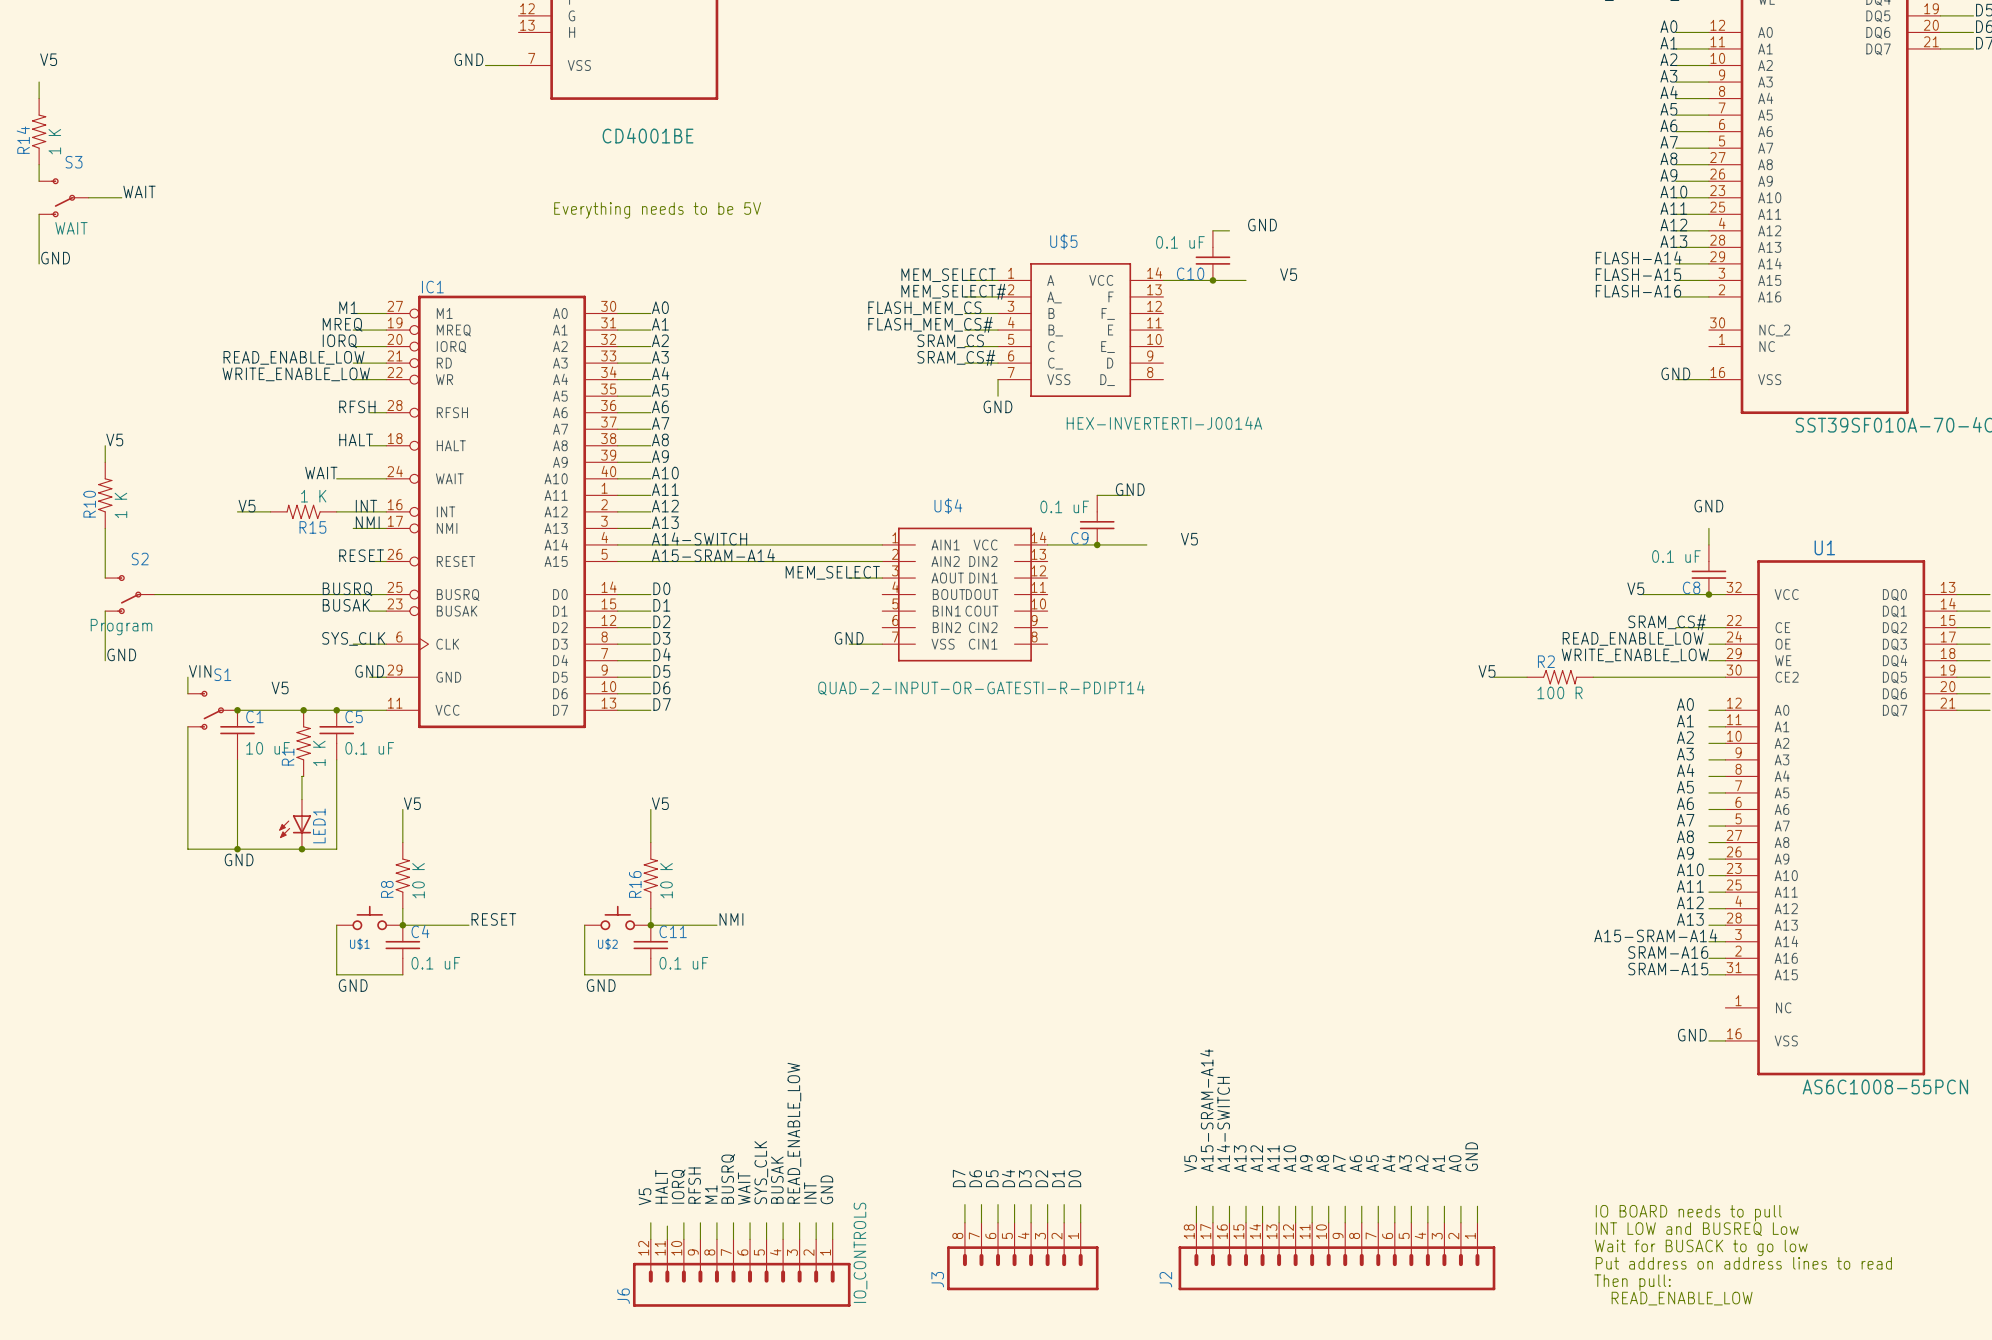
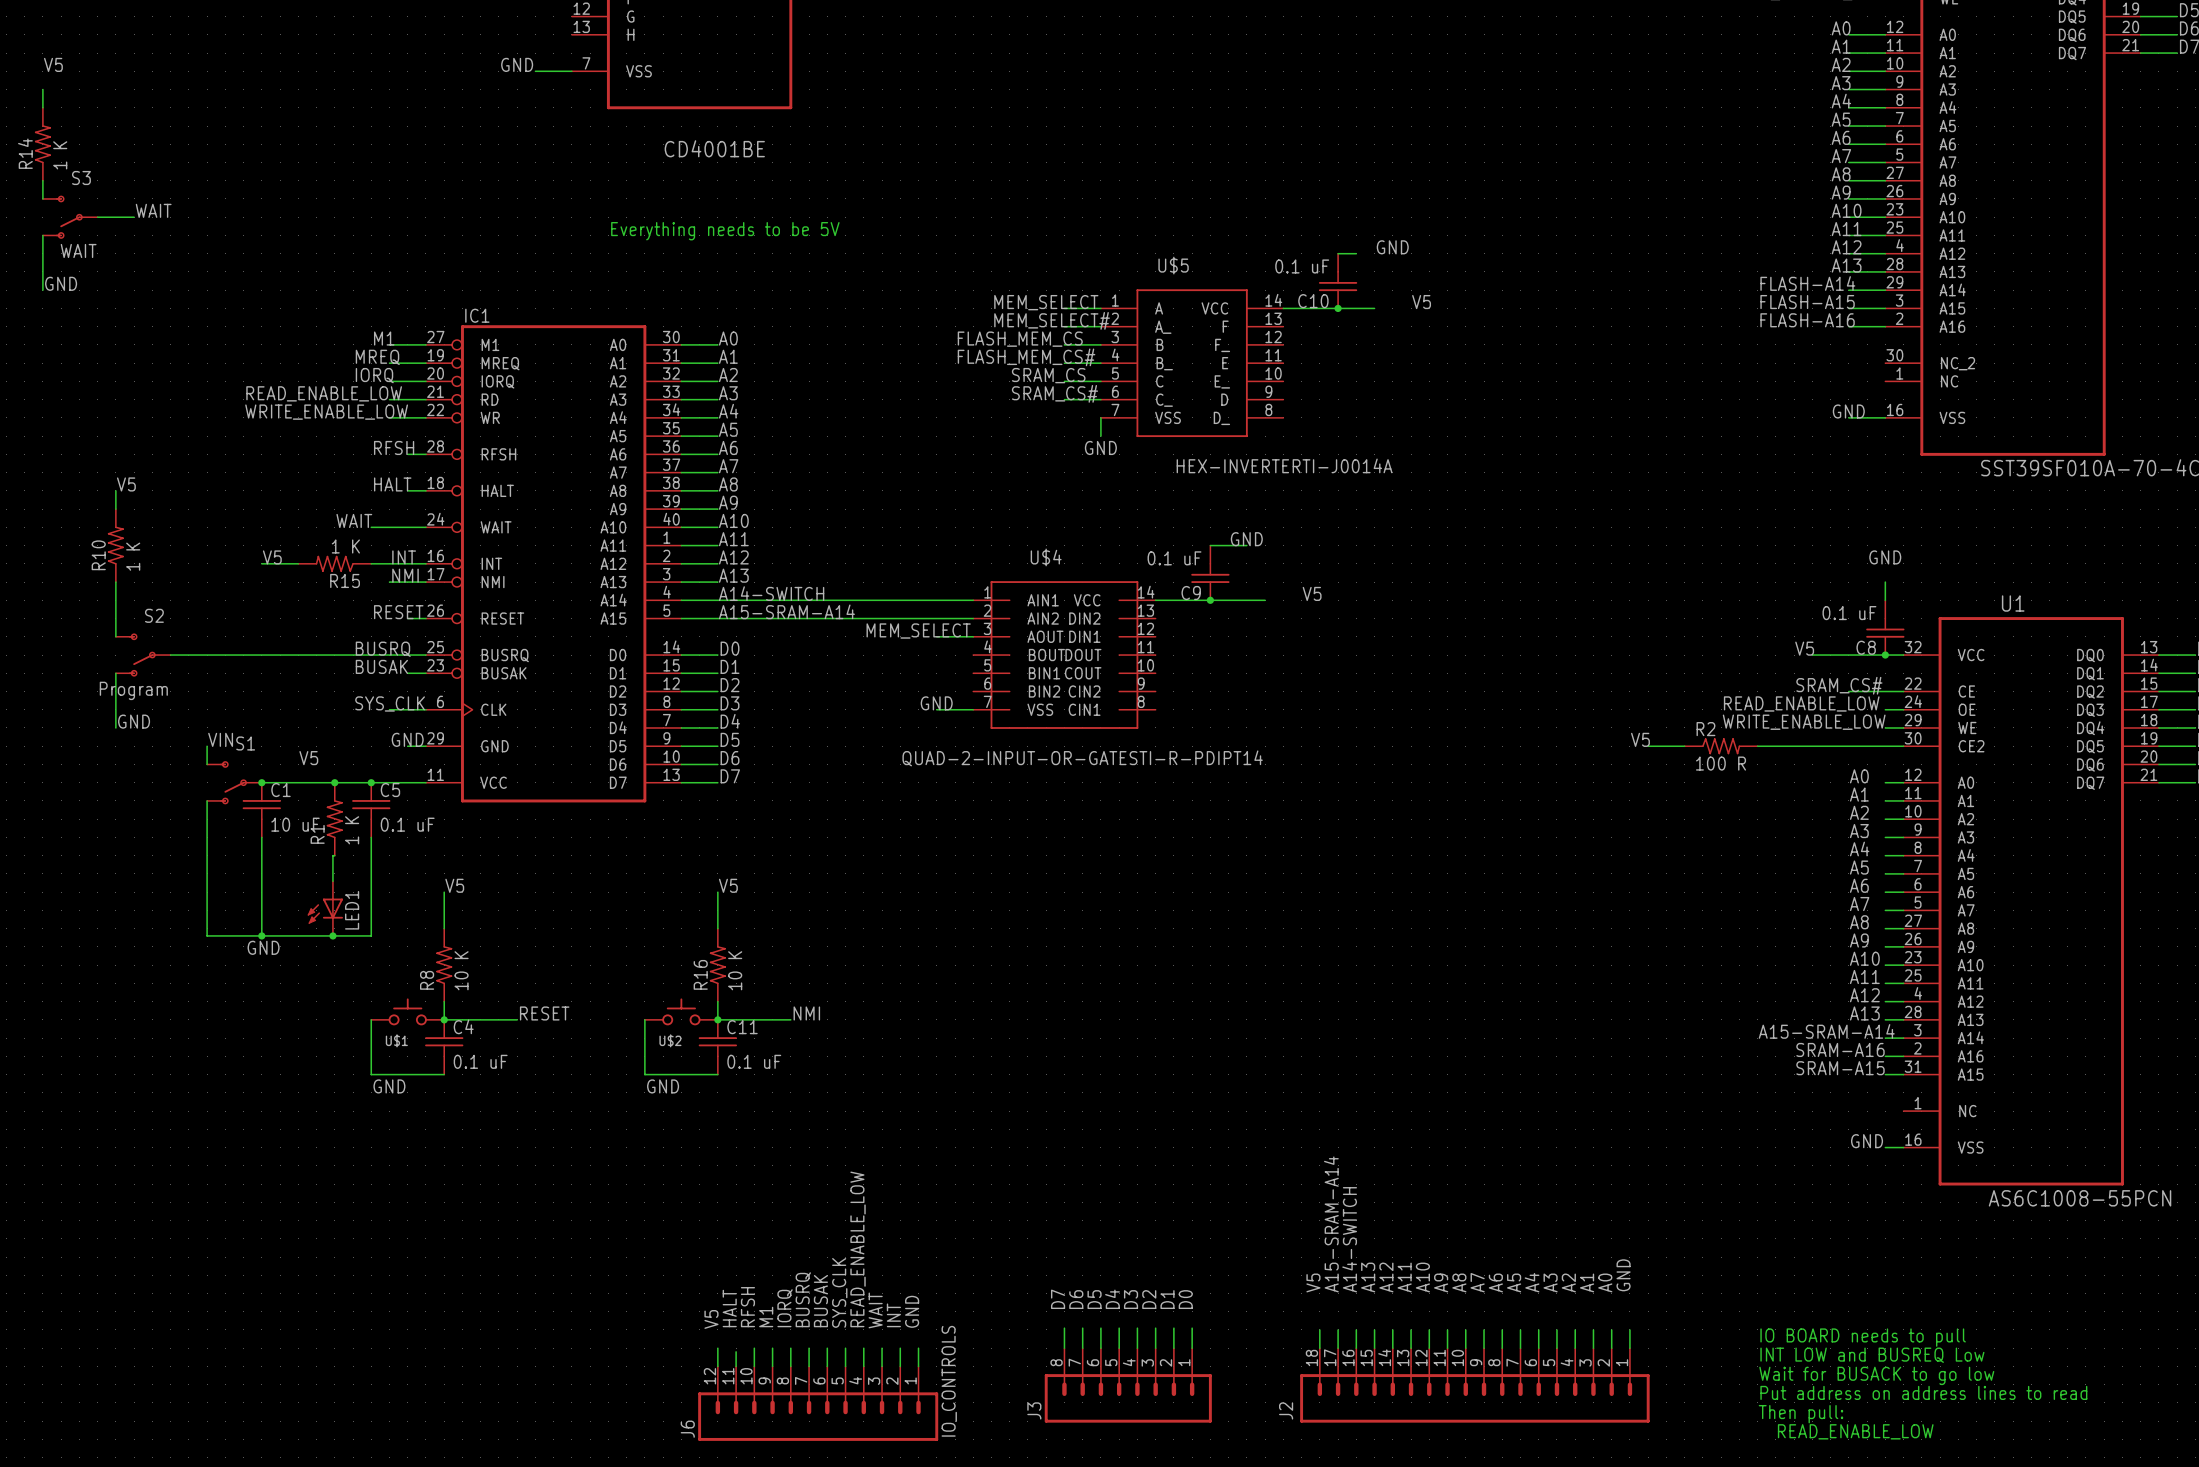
label: READ_ENABLE_LOW (794, 1133) -> WAIT (875, 1310)
label: BUSAK (777, 1180) -> READ_ENABLE_LOW (858, 1249)
label: RFSH (694, 1185) -> M1 (766, 1316)
label: IORQ (678, 1186) -> RFSH (747, 1307)
label: WAIT (744, 1188) -> BUSAK (820, 1301)
label: M1 (711, 1194) -> IORQ (785, 1308)

